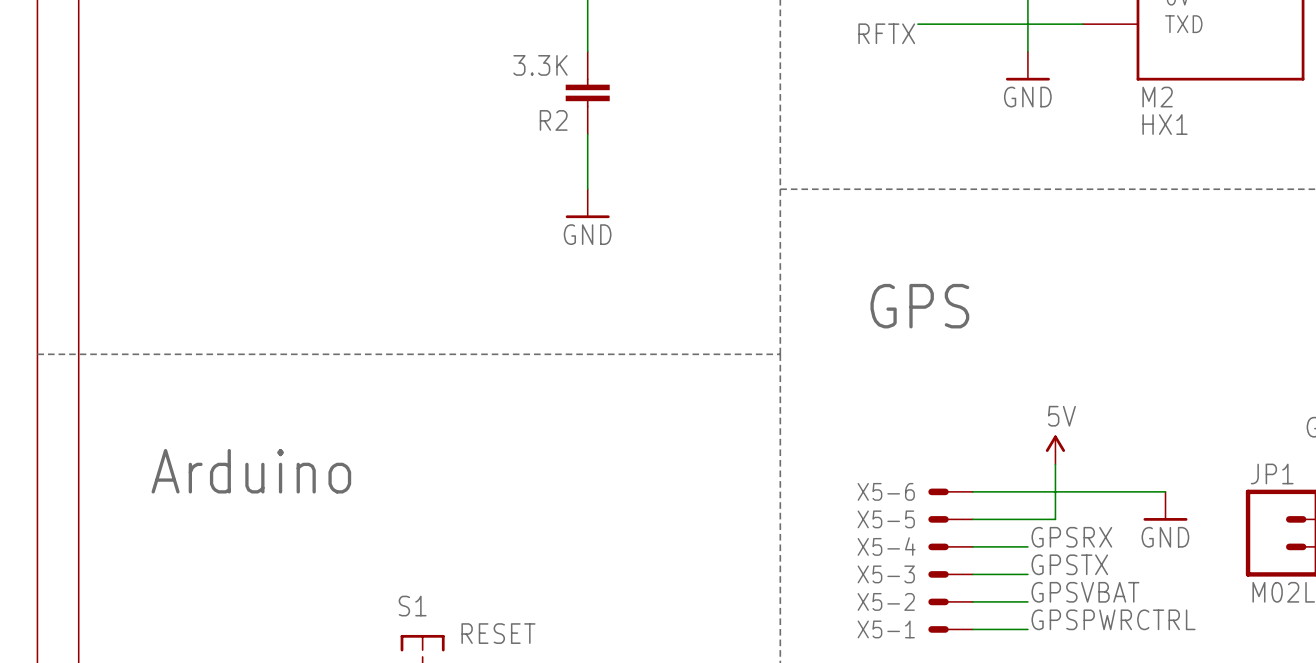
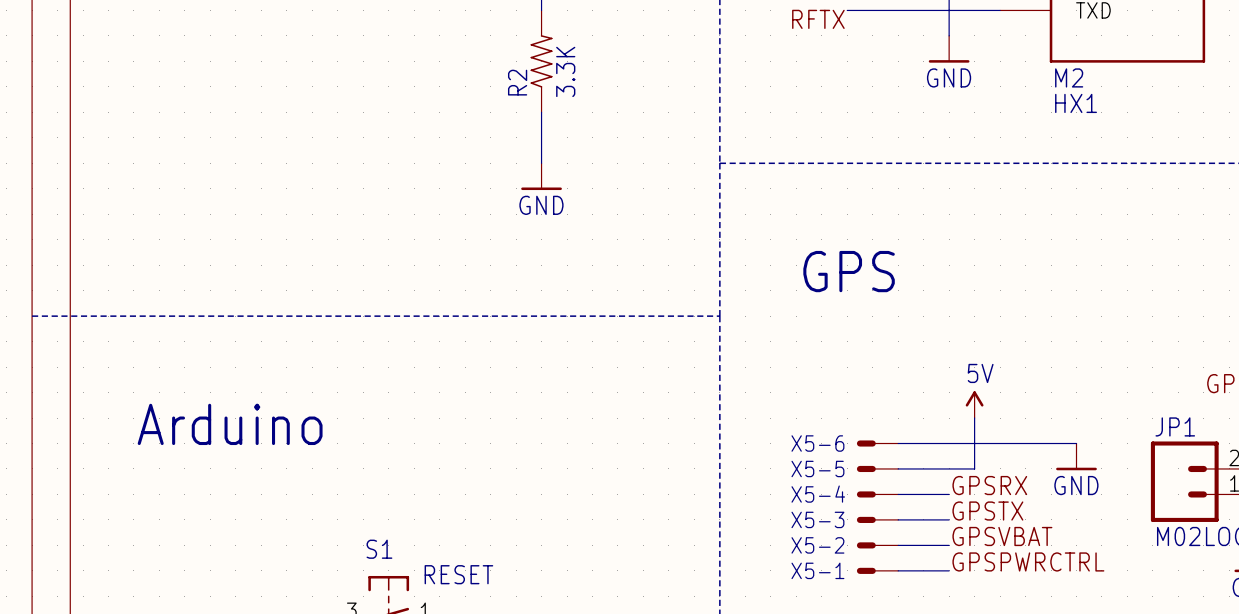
R2 symbol: [565, 51, 610, 135] -> [530, 10, 553, 113]
R2 value position: 3.3K (540, 65) -> 3.3K (565, 71)

